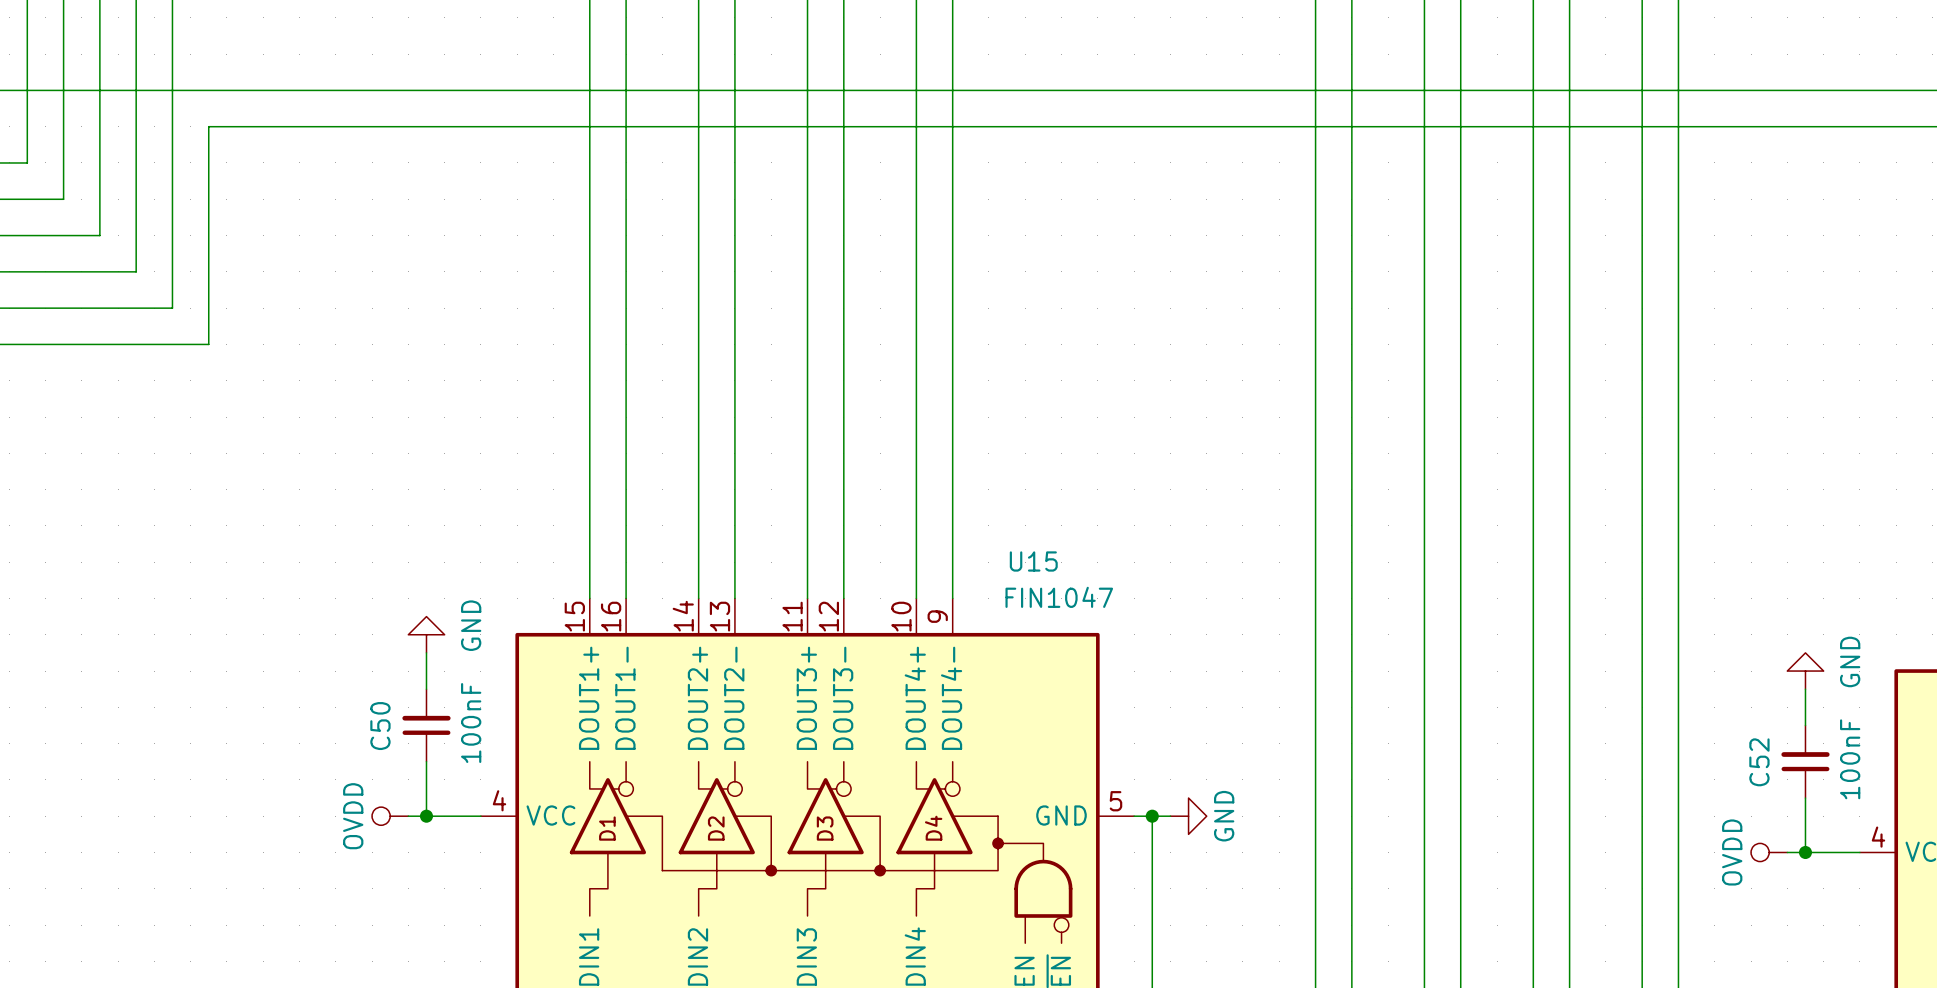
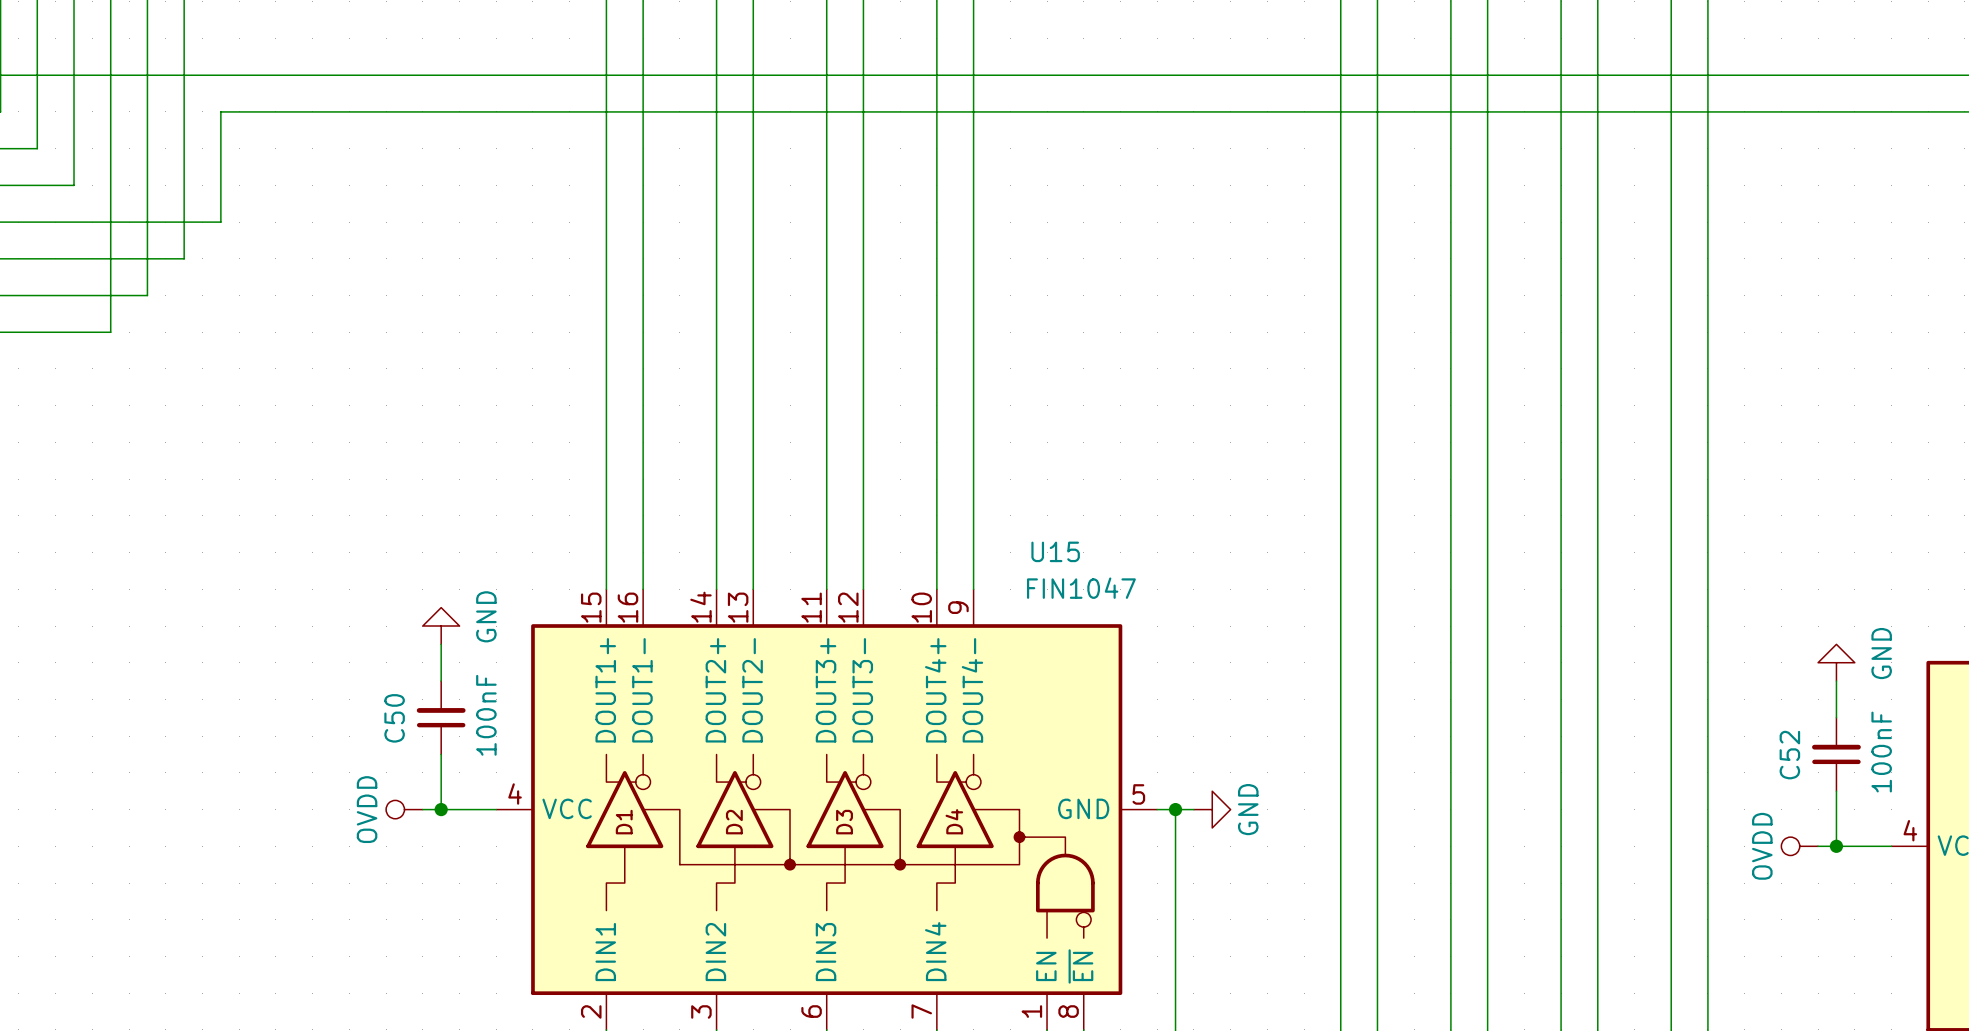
wire: (208, 235) (208, 344) (99, 344) -> (220, 222) (110, 222) (110, 332)
wire: (172, 271) (172, 308) (136, 308) -> (184, 258) (147, 258) (147, 295)

